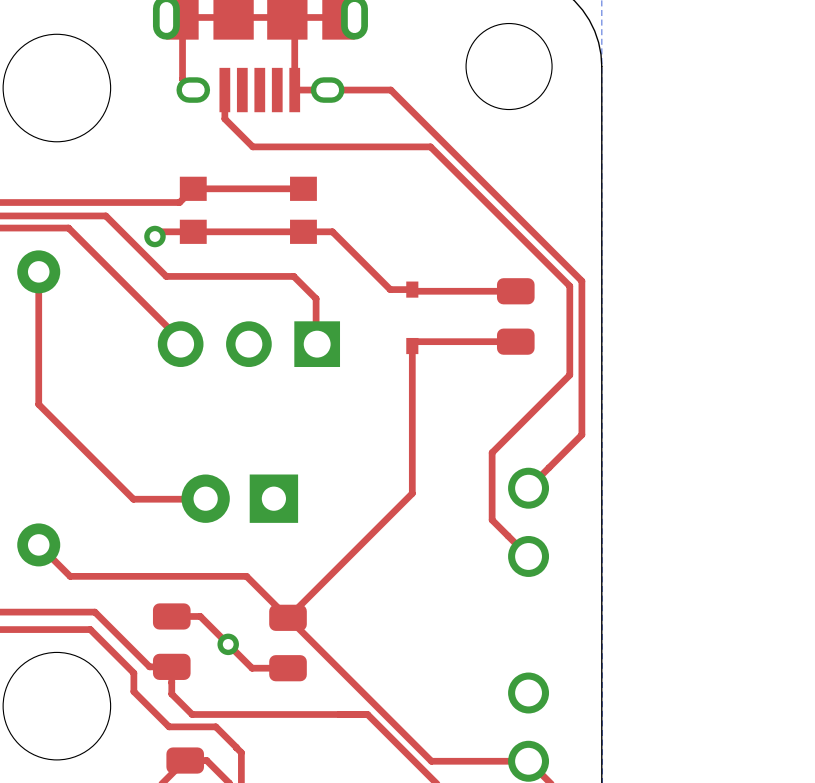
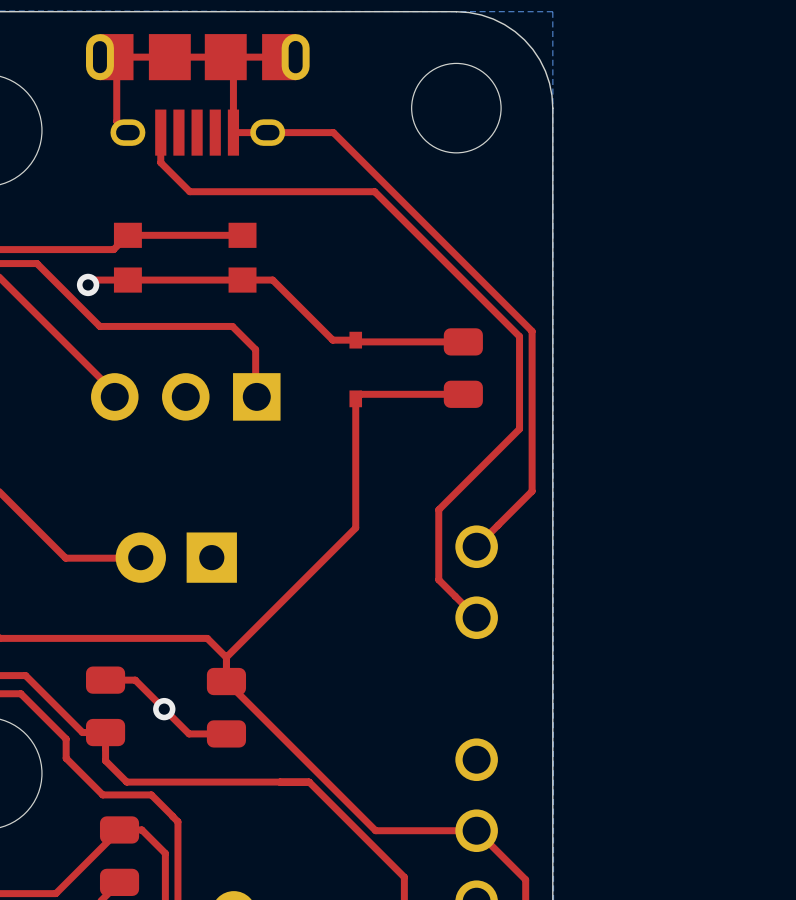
top track: (412, 470) (412, 493) (288, 617) (246, 576) -> (355, 527) (226, 657) (226, 681)
top track: none -> (183, 638) (207, 638) (226, 657)

